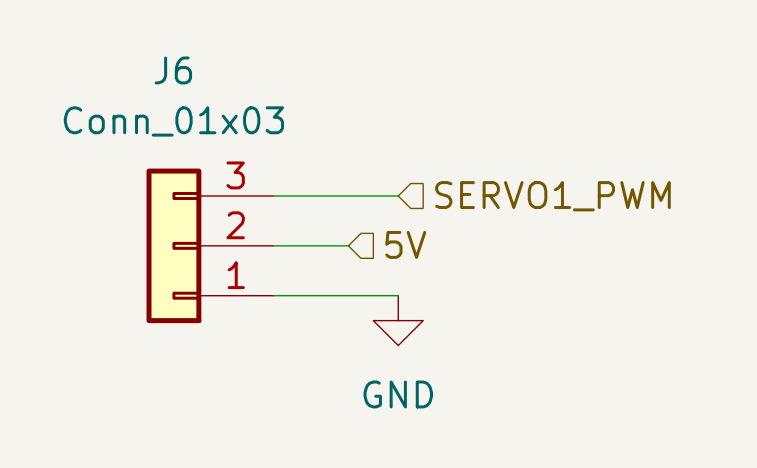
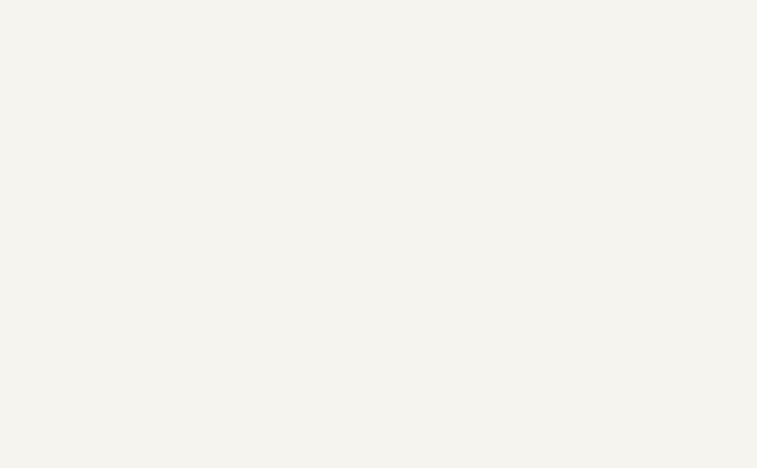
wire: (273, 195) (398, 195) -> none
hierarchical label: SERVO1_PWM (552, 196) -> none
hierarchical label: 5V (405, 244) -> none
J6: Conn_01x03 (210, 245) -> none
wire: (273, 245) (348, 245) -> none
wire: (273, 295) (398, 295) -> none
power symbol: GND (398, 320) -> none

